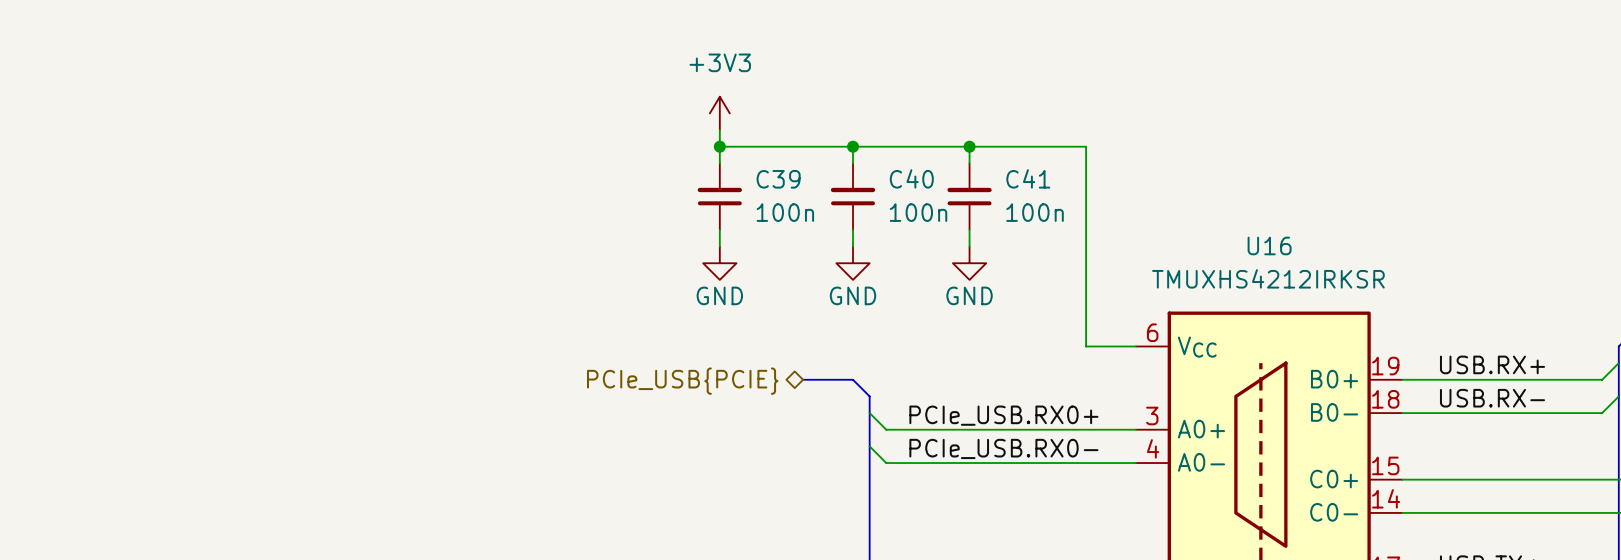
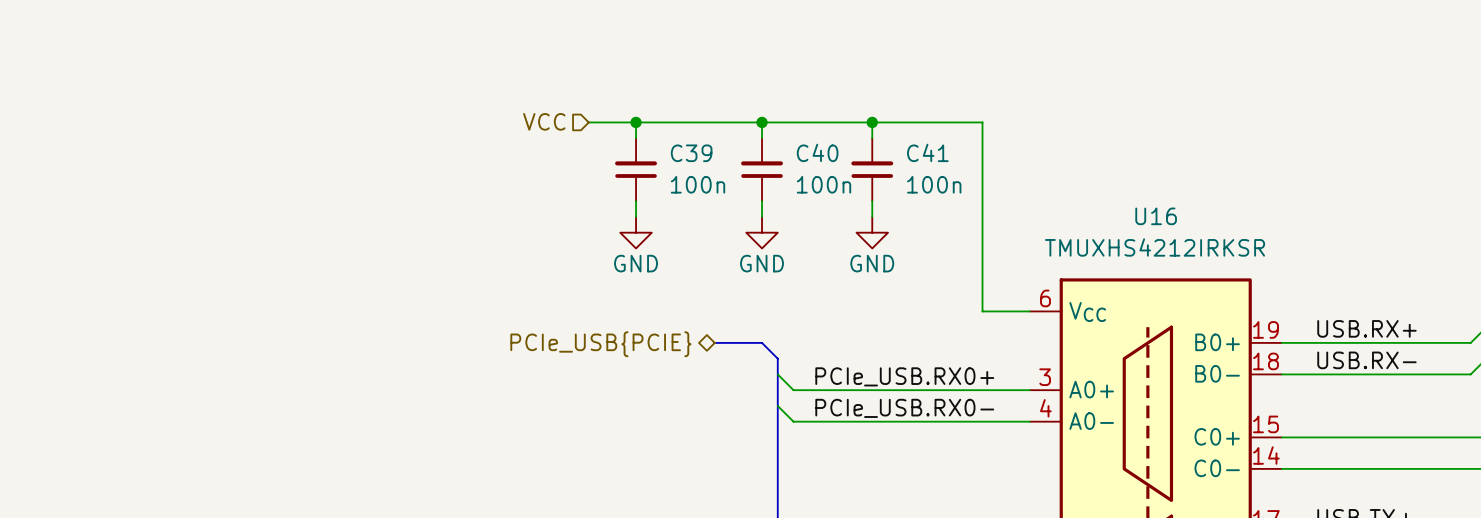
power symbol: +3V3 (719, 113) -> none
wire: (719, 130) (719, 146) -> (588, 122) (636, 122)
hierarchical label: none -> VCC (544, 121)

